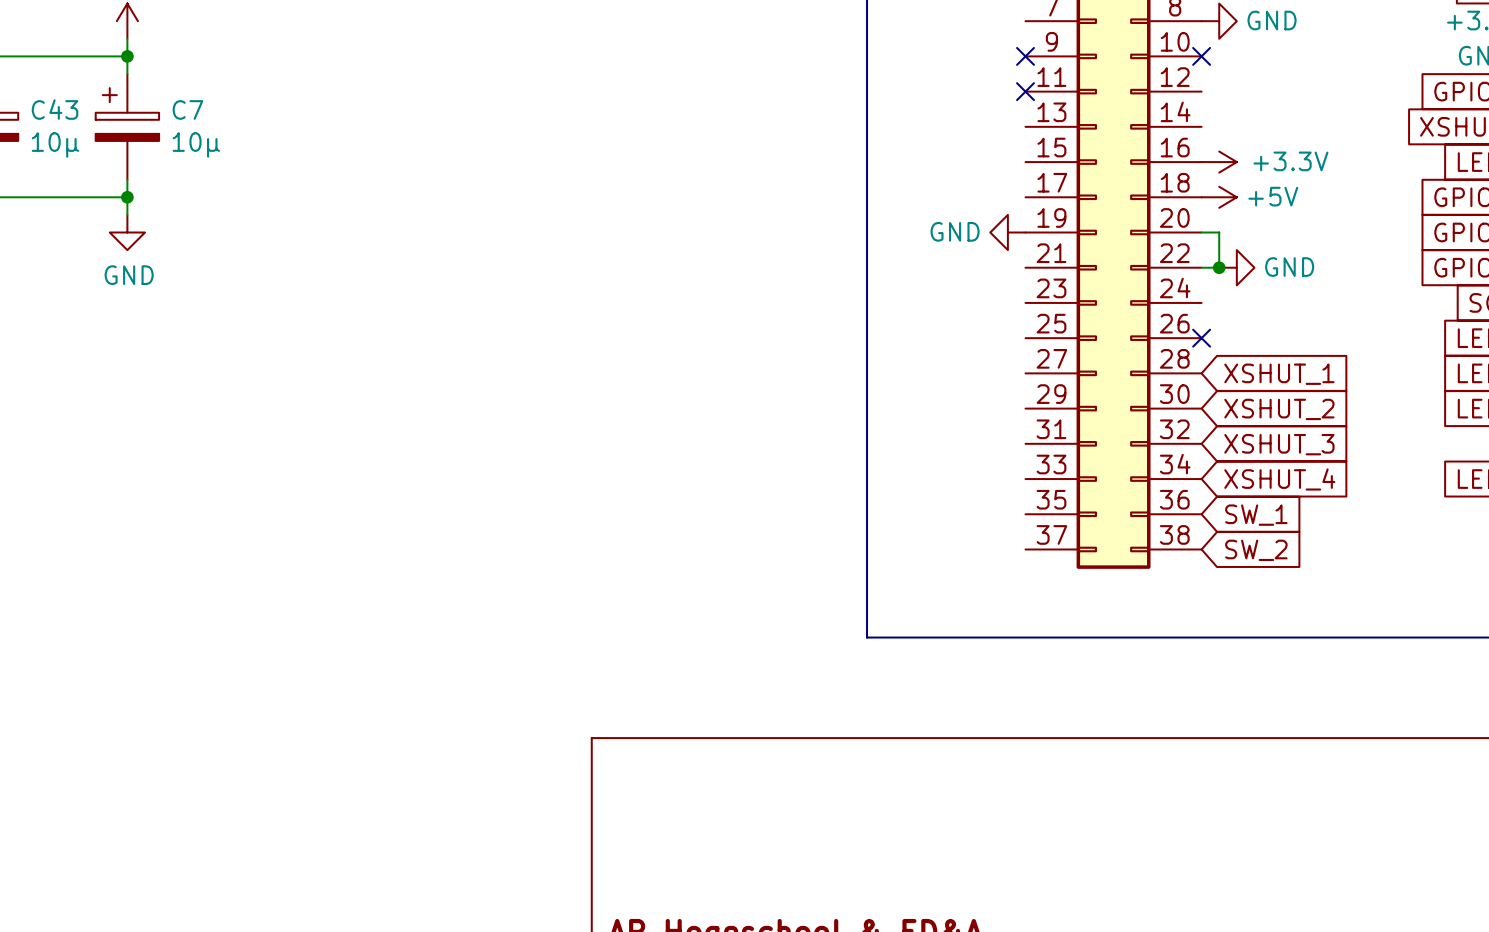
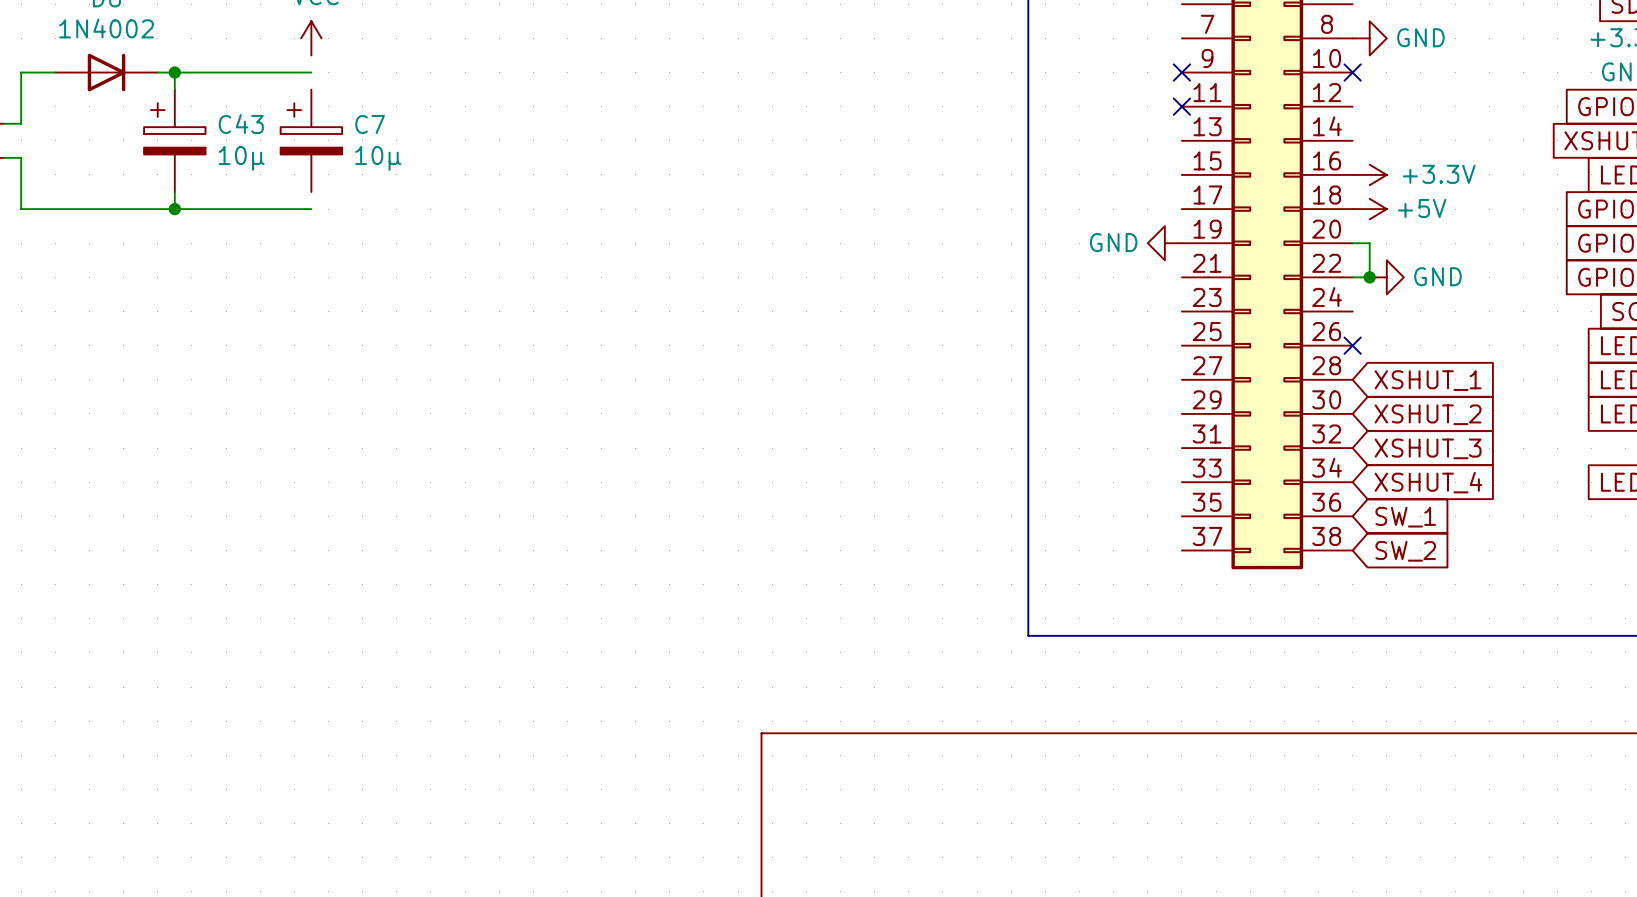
wire: (127, 38) (127, 74) -> none
junction: (127, 56) -> none
wire: (127, 179) (127, 214) -> none
junction: (127, 197) -> none
power symbol: GND (127, 232) -> none

